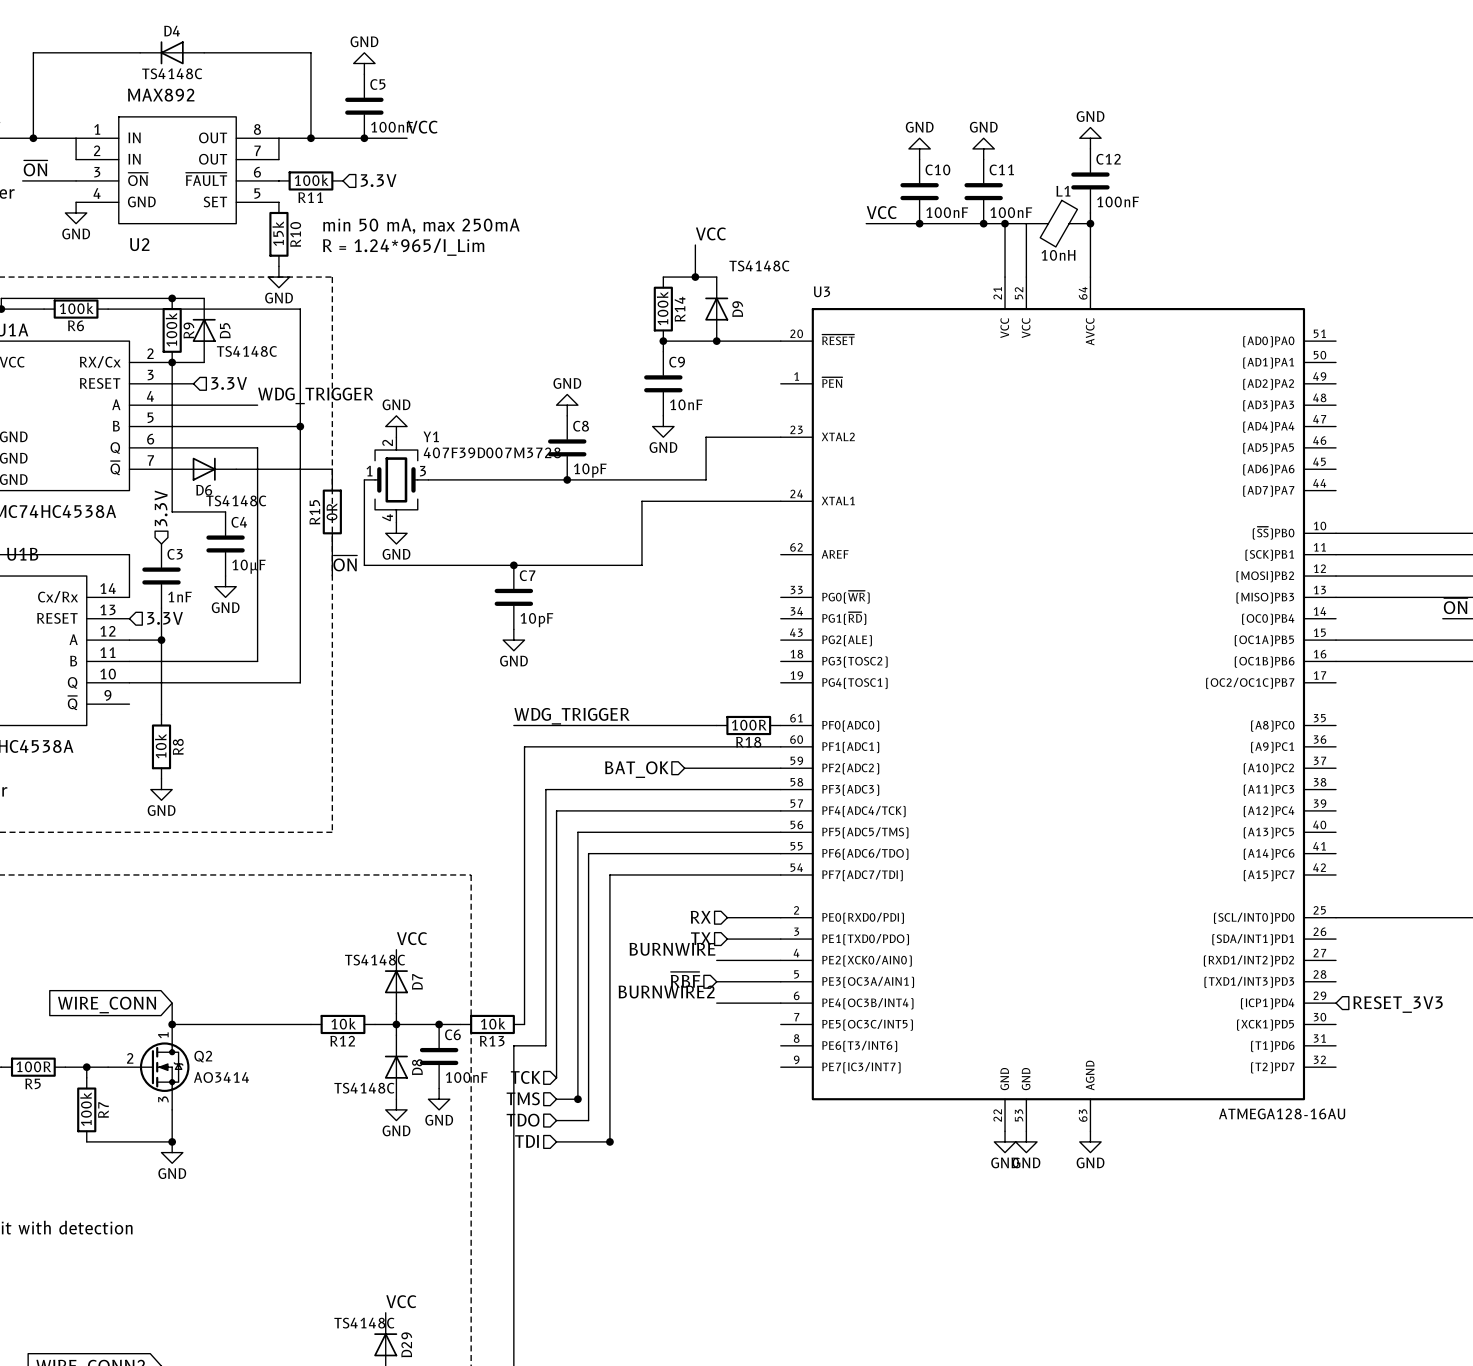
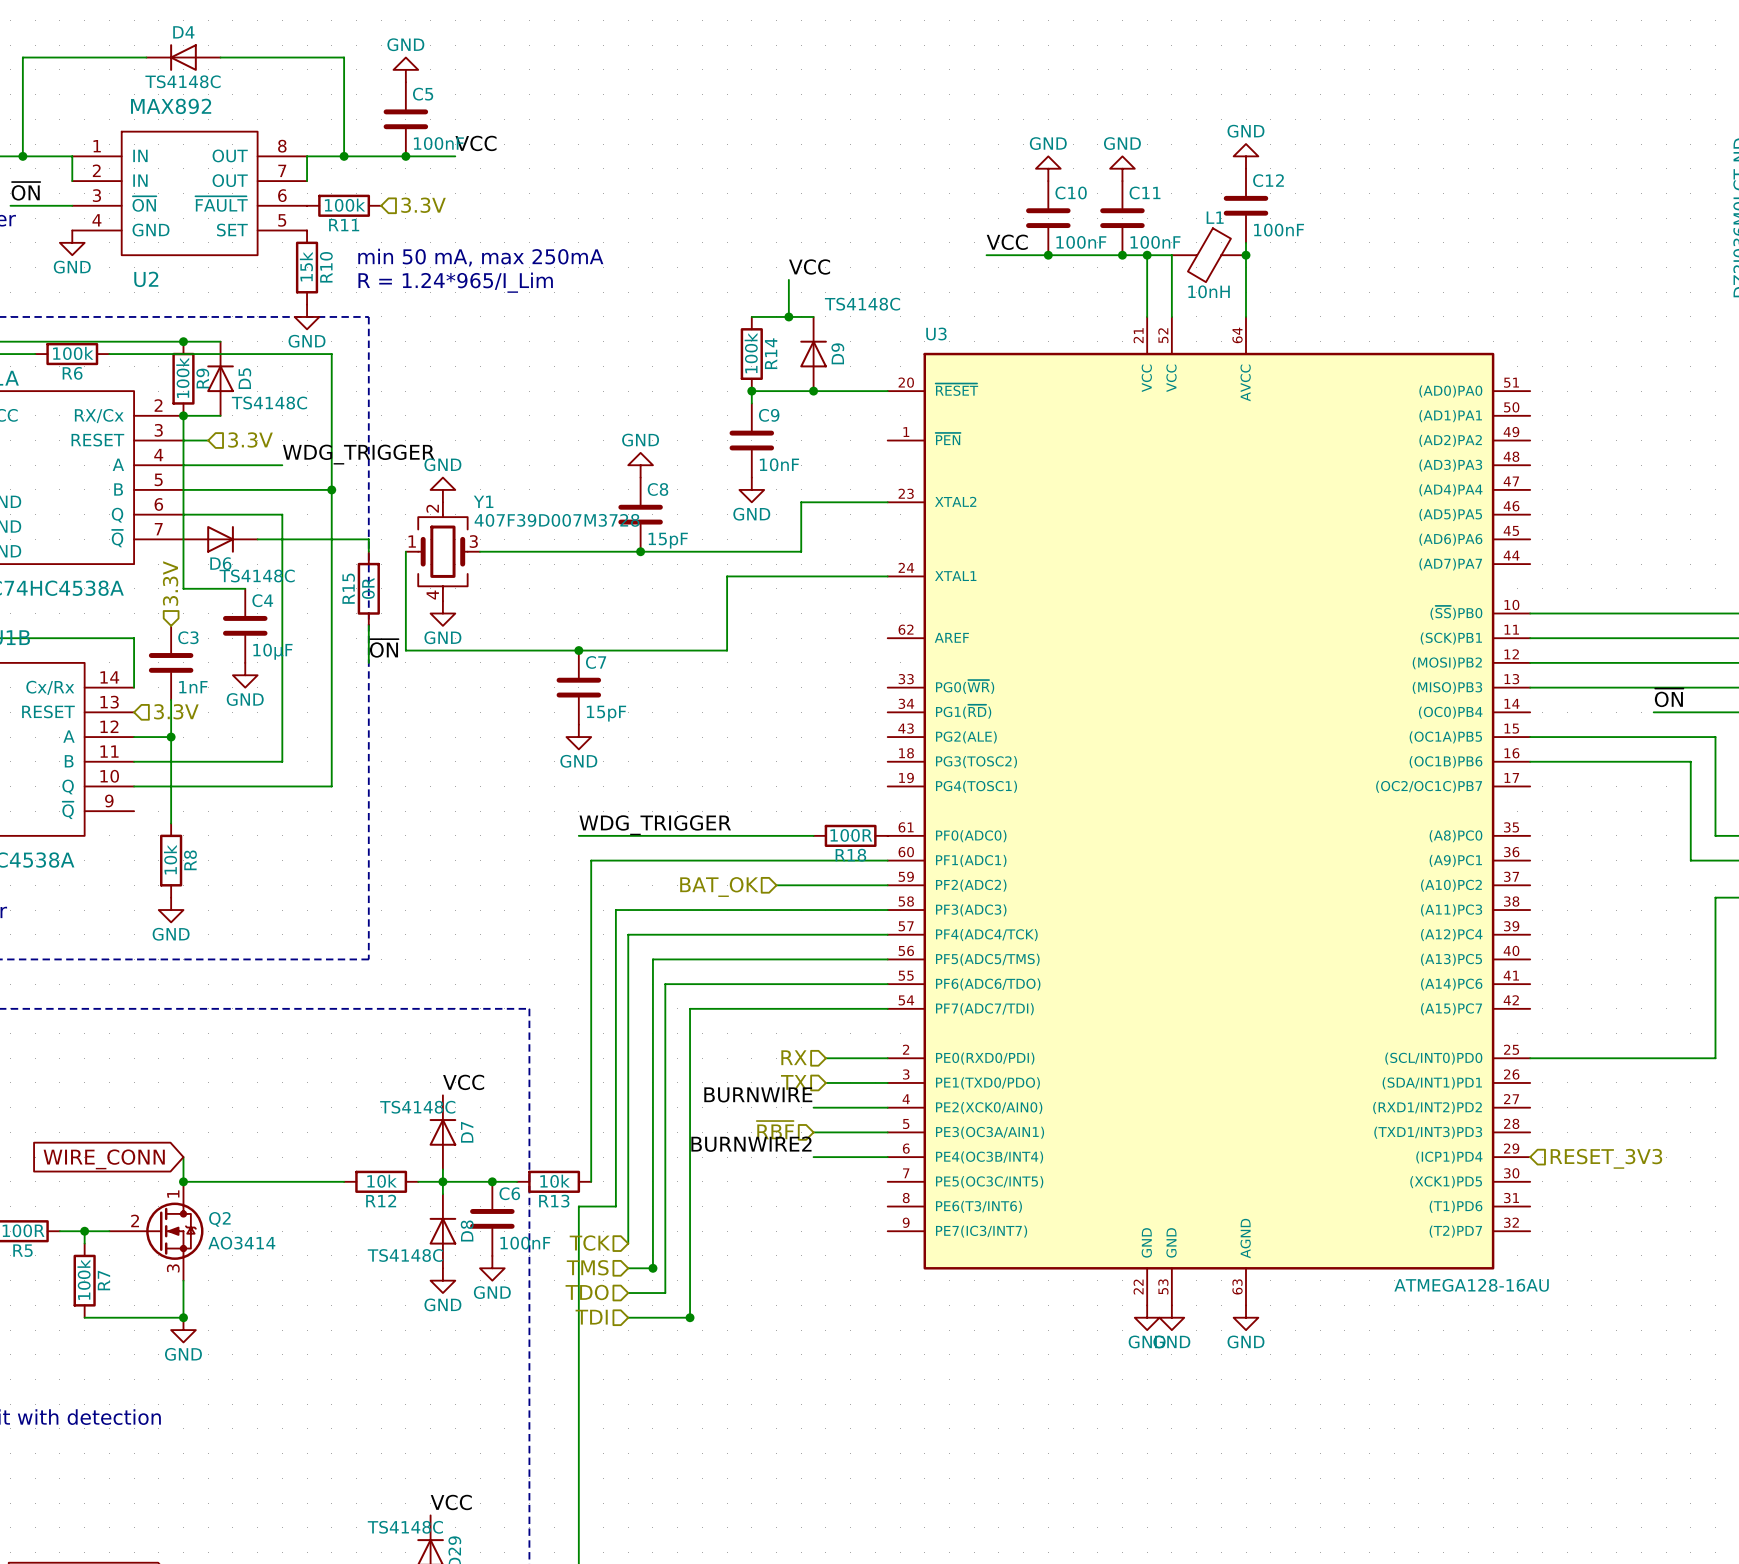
C8 value: 10pF (590, 470) -> 15pF (668, 540)
C7 value: 10pF (536, 620) -> 15pF (606, 713)

